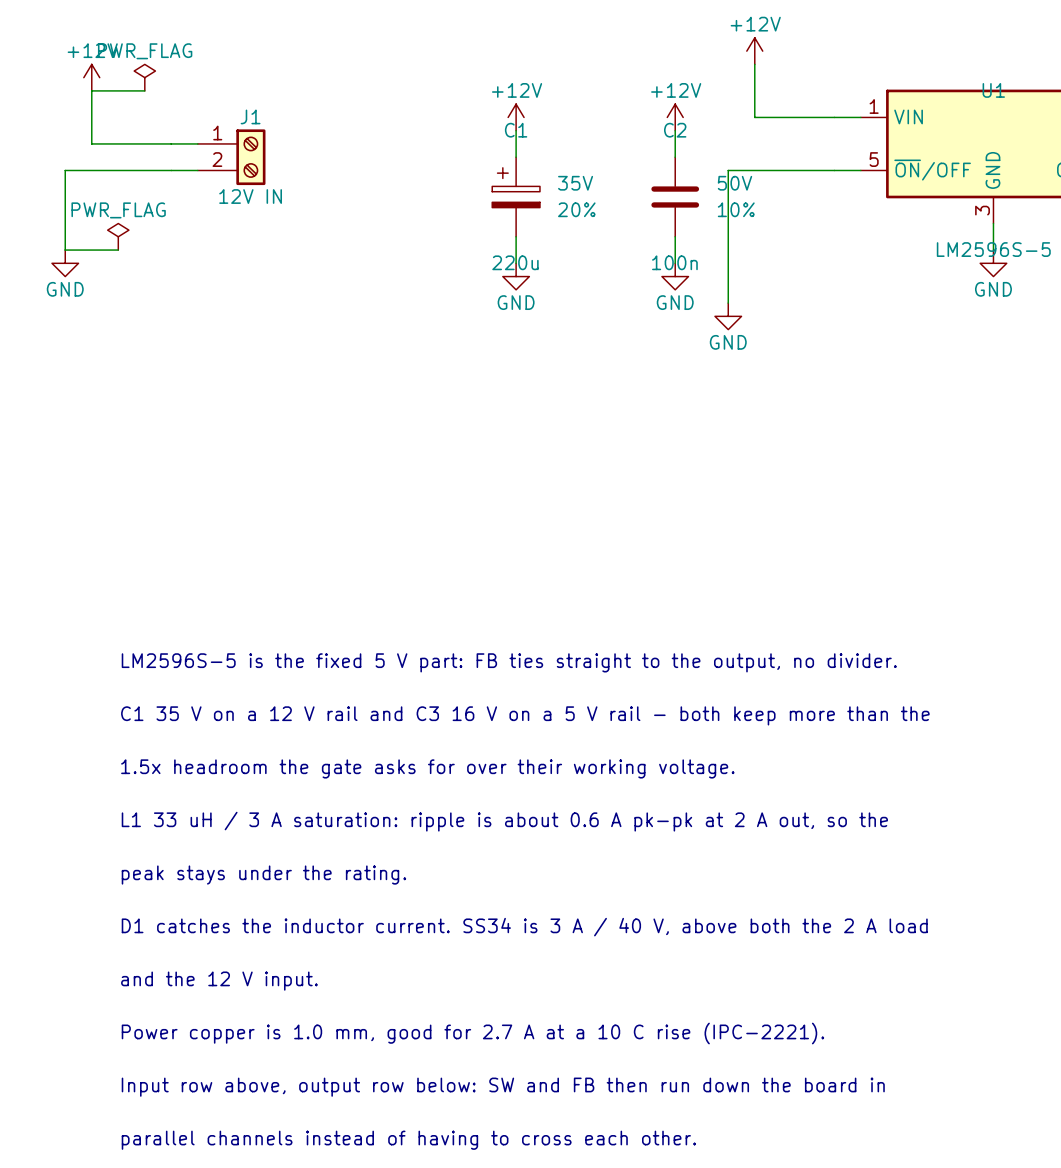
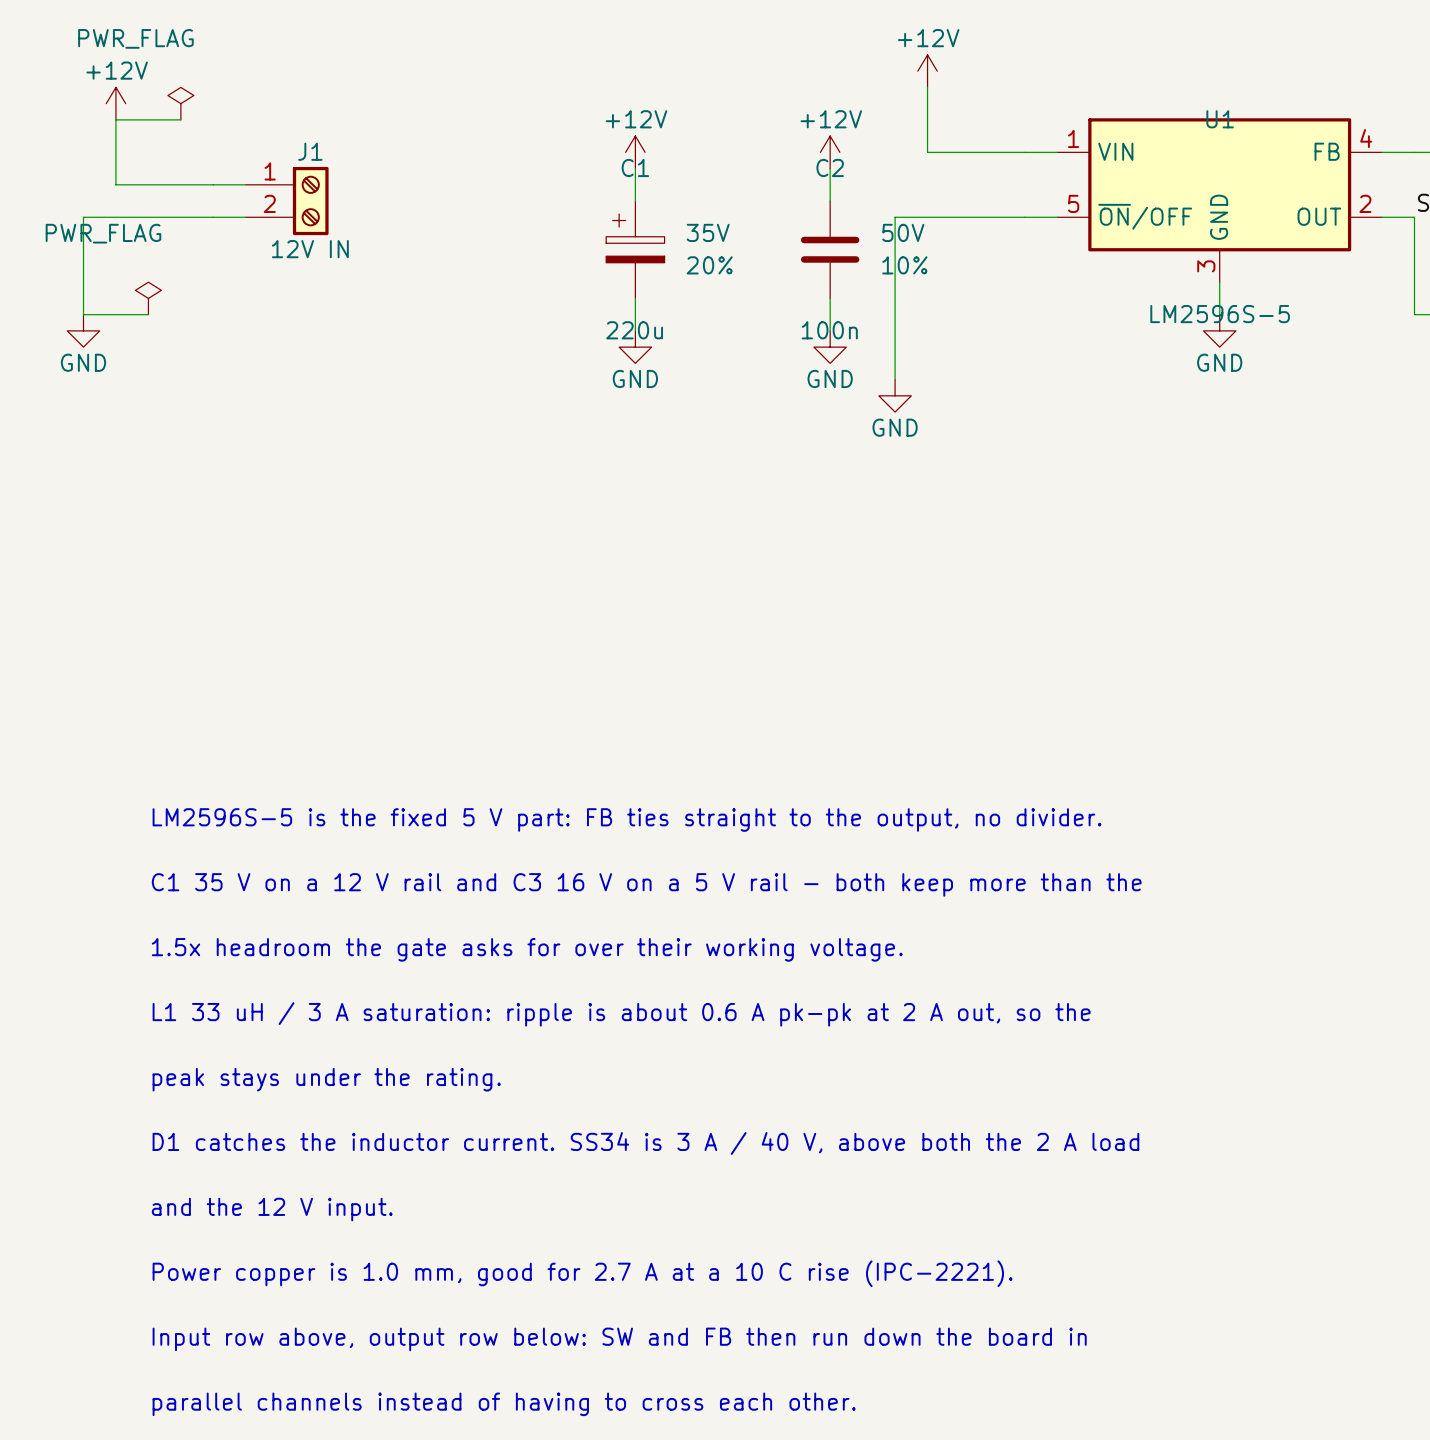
power symbol text position: PWR_FLAG (145, 51) -> PWR_FLAG (135, 38)
power symbol text position: PWR_FLAG (118, 210) -> PWR_FLAG (103, 233)

